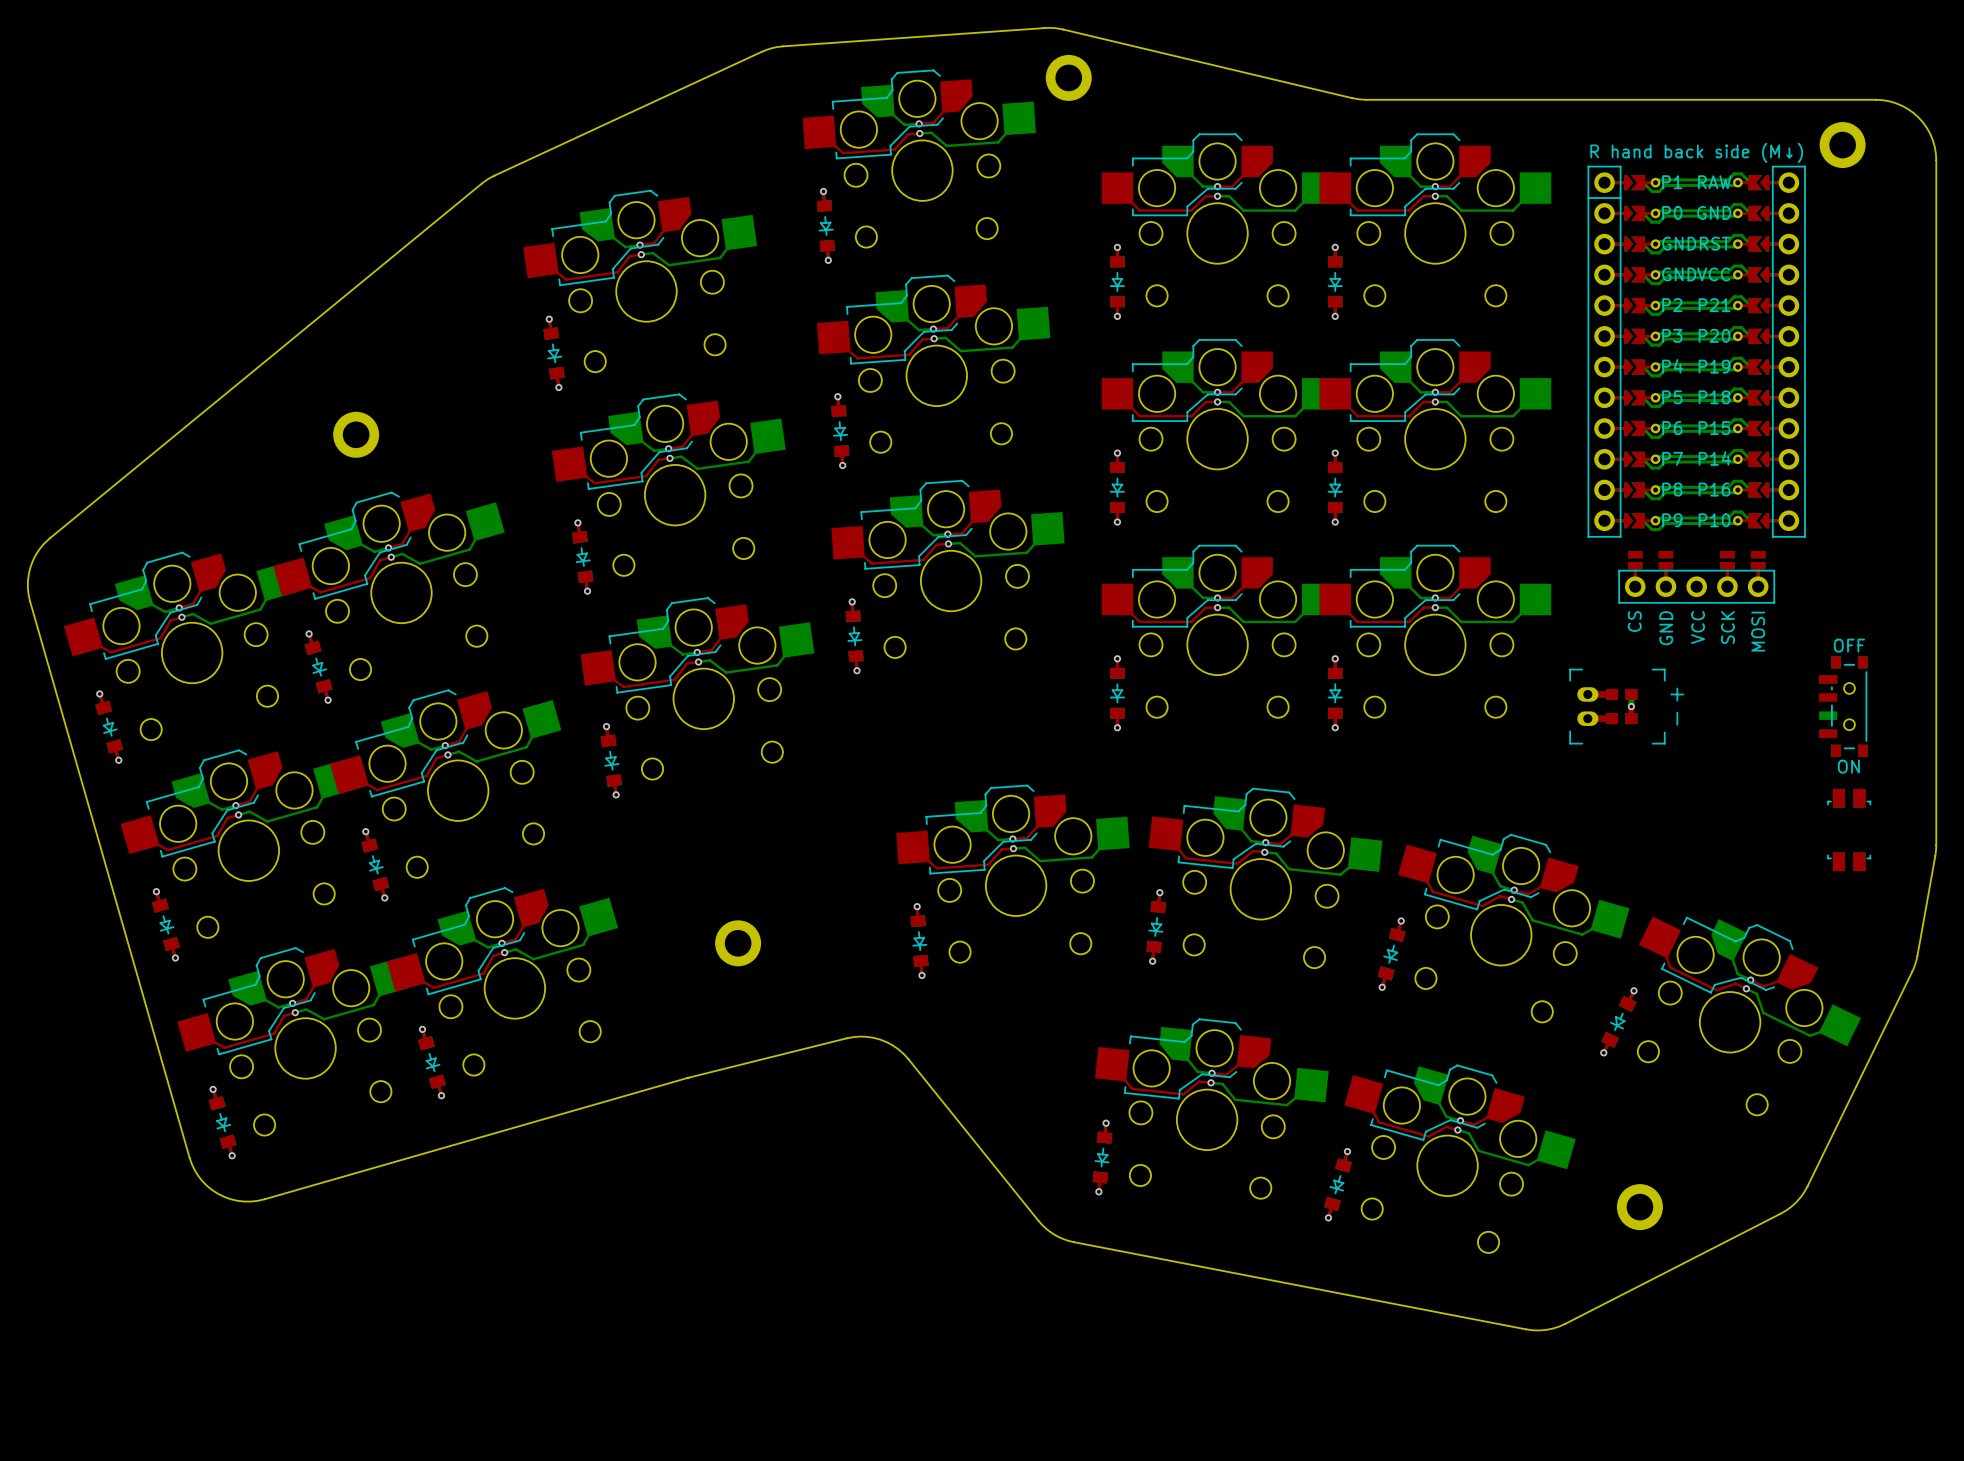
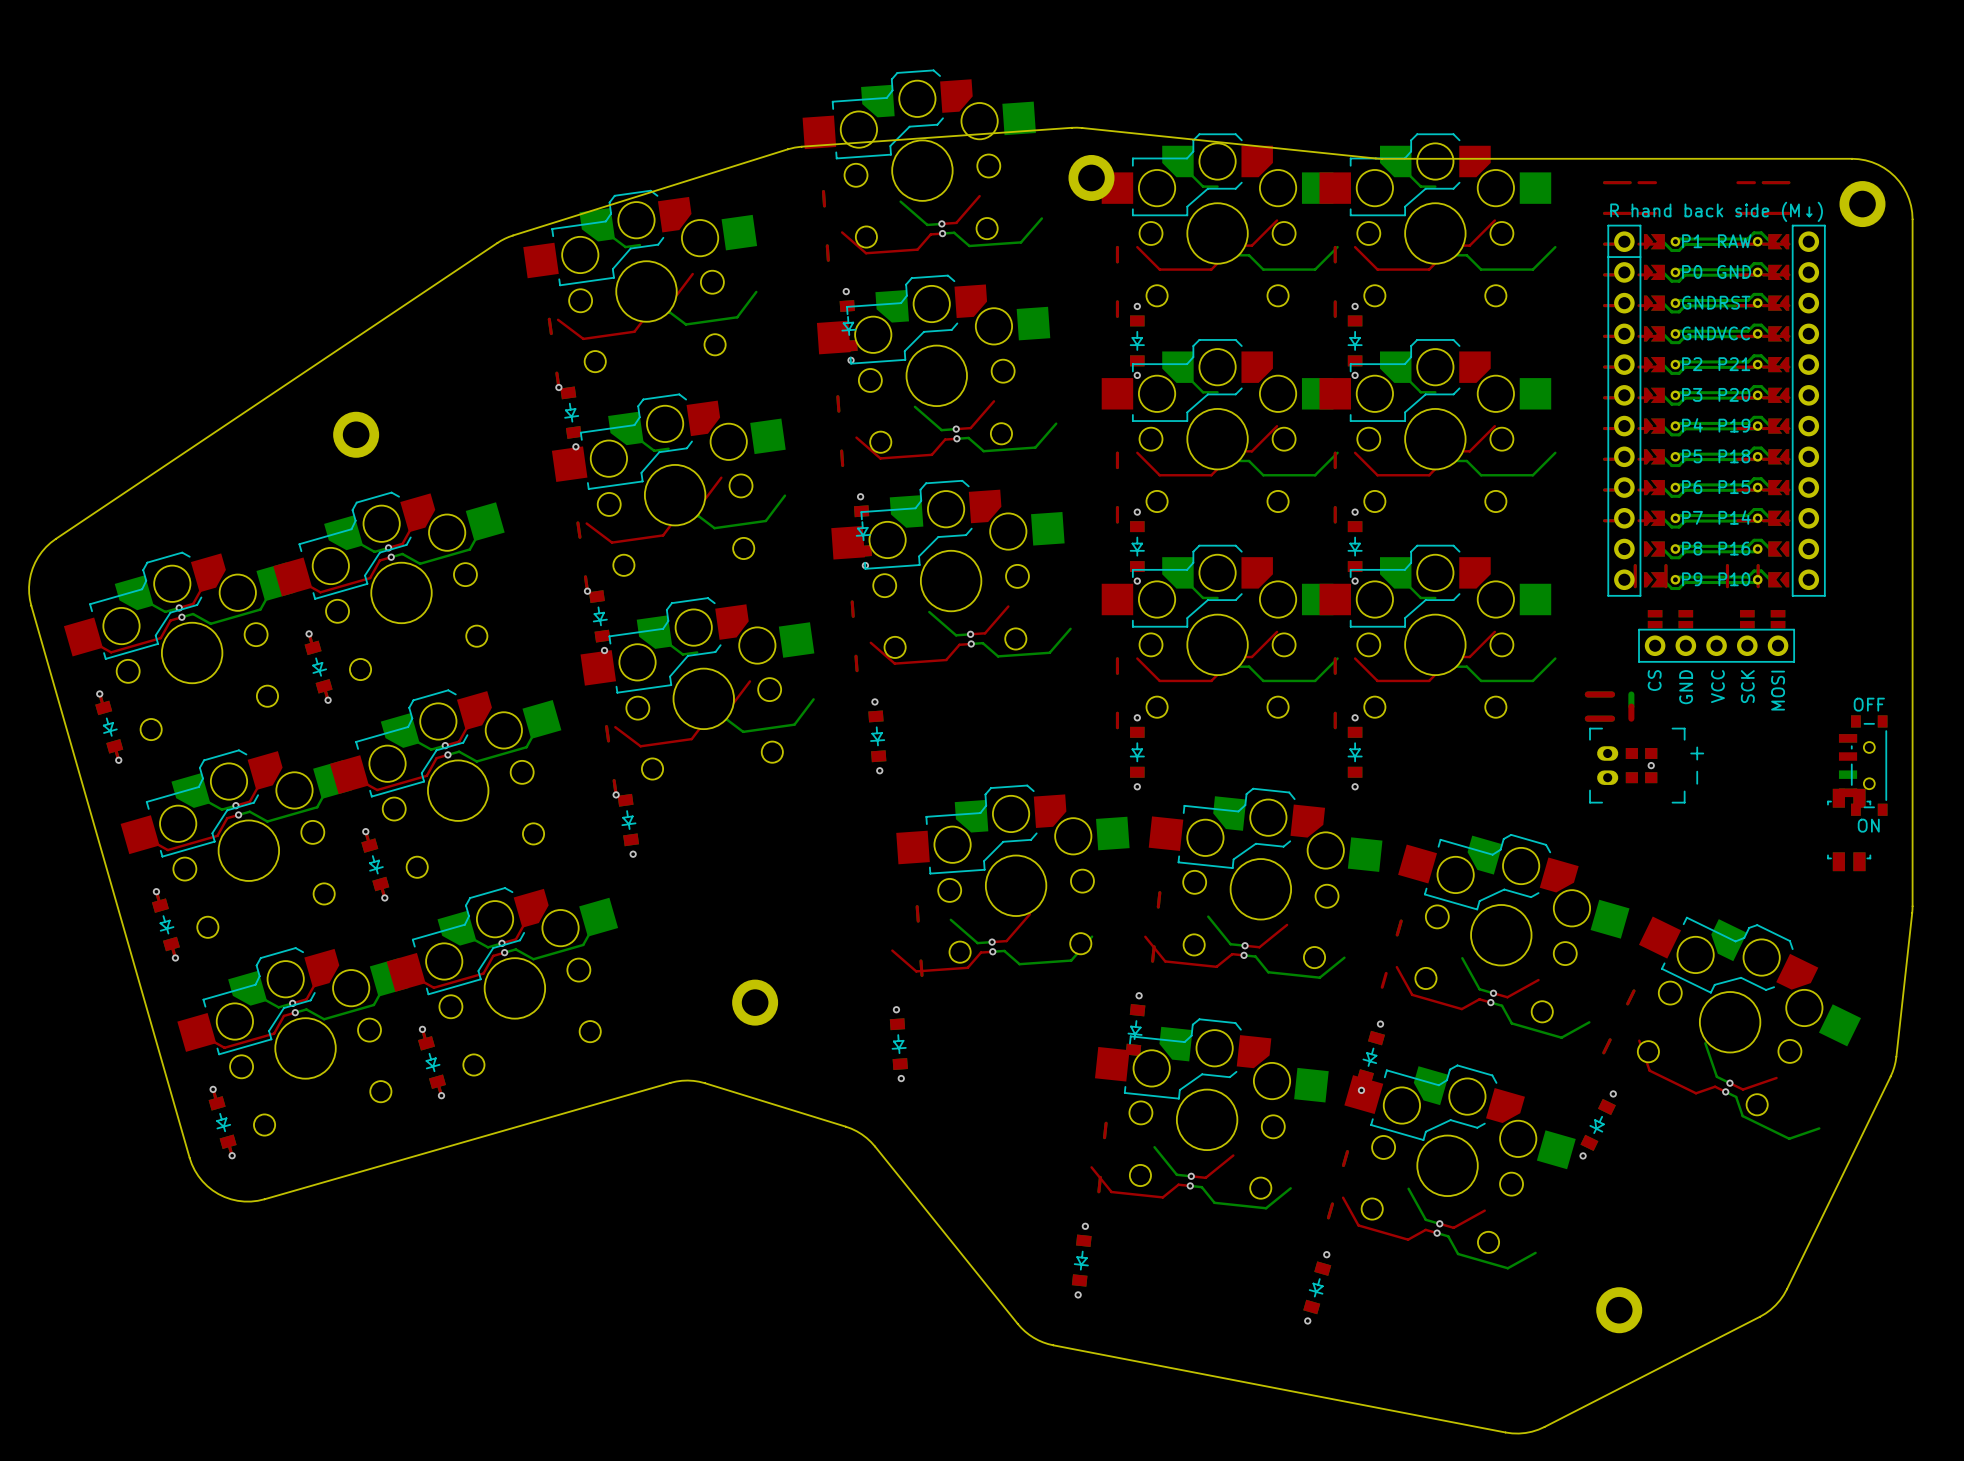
part position: (1068, 77) -> (1091, 177)
top track: (956, 96) (933, 122) (919, 123) -> (979, 196) (956, 222) (941, 223)
bottom track: (877, 101) (904, 124) (919, 123) -> (900, 201) (927, 224) (941, 223)
bottom track: (1019, 118) (998, 142) (946, 145) (931, 132) (919, 133) -> (1041, 218) (1021, 242) (969, 246) (954, 232) (942, 233)
via: (919, 123) -> none
top track: (819, 132) (843, 153) (894, 149) (908, 134) (919, 133) -> (842, 232) (866, 253) (917, 249) (930, 234) (942, 233)
via: (919, 133) -> none
part position: (1842, 145) -> (1862, 204)
top track: (1257, 161) (1232, 186) (1217, 186) -> (1277, 220) (1251, 245) (1237, 245)
top track: (1474, 161) (1449, 186) (1435, 186) -> (1494, 220) (1469, 245) (1455, 245)
bottom track: (1658, 180) (1728, 180) (1734, 173) (1741, 173) (1750, 182) (1754, 182) -> (1678, 239) (1747, 239) (1754, 232) (1761, 232) (1770, 241) (1774, 241)
bottom track: (1638, 182) (1643, 182) (1651, 191) (1659, 191) (1665, 185) (1735, 185) -> (1658, 241) (1663, 241) (1671, 250) (1679, 250) (1685, 244) (1754, 244)
via: (1217, 186) -> none
via: (1435, 186) -> none
top track: (1117, 188) (1139, 210) (1191, 210) (1205, 196) (1217, 196) -> (1137, 247) (1159, 269) (1211, 269) (1225, 255) (1237, 255)
bottom track: (1317, 188) (1295, 210) (1243, 210) (1229, 196) (1217, 196) -> (1337, 247) (1315, 269) (1263, 269) (1249, 255) (1237, 255)
top track: (1335, 188) (1357, 210) (1409, 210) (1423, 196) (1435, 196) -> (1355, 247) (1377, 269) (1429, 269) (1443, 255) (1455, 255)
bottom track: (1535, 188) (1513, 210) (1461, 210) (1446, 196) (1435, 196) -> (1555, 247) (1532, 269) (1481, 269) (1466, 255) (1455, 255)
via: (823, 191) -> none
via: (1217, 196) -> none
via: (1435, 196) -> none
bottom track: (1658, 210) (1728, 210) (1734, 204) (1741, 204) (1750, 213) (1754, 213) -> (1678, 269) (1747, 269) (1754, 263) (1761, 263) (1770, 272) (1774, 272)
bottom track: (1638, 213) (1643, 213) (1651, 222) (1659, 222) (1665, 216) (1735, 216) -> (1658, 272) (1663, 272) (1671, 281) (1679, 281) (1685, 275) (1754, 275)
top track: (675, 214) (654, 243) (639, 245) -> (692, 274) (671, 302) (656, 304)
via: none -> (941, 223)
part: (825, 225) -> none
bottom track: (739, 232) (720, 257) (668, 265) (652, 253) (641, 254) -> (756, 291) (737, 317) (685, 324) (669, 312) (658, 313)
via: none -> (942, 233)
bottom track: (1658, 241) (1728, 241) (1734, 235) (1741, 235) (1750, 244) (1754, 244) -> (1678, 300) (1747, 300) (1754, 294) (1761, 294) (1770, 303) (1774, 303)
bottom track: (1638, 244) (1643, 244) (1651, 252) (1659, 252) (1665, 246) (1735, 246) -> (1658, 303) (1663, 303) (1671, 311) (1679, 311) (1685, 305) (1754, 305)
via: (639, 245) -> none
via: (1117, 247) -> none
via: (1335, 247) -> none
top track: (641, 254) (629, 256) (617, 272) (566, 279) (541, 260) -> (658, 313) (646, 315) (634, 331) (583, 338) (558, 319)
via: (641, 254) -> none
via position: (828, 260) -> (846, 291)
bottom track: (1658, 272) (1728, 272) (1734, 266) (1741, 266) (1750, 274) (1754, 274) -> (1678, 331) (1747, 331) (1754, 325) (1761, 325) (1770, 333) (1774, 333)
bottom track: (1638, 274) (1643, 274) (1651, 283) (1659, 283) (1665, 277) (1735, 277) -> (1658, 333) (1663, 333) (1671, 342) (1679, 342) (1685, 336) (1754, 336)
part position: (1117, 281) -> (1137, 340)
part position: (1335, 281) -> (1355, 340)
top track: (971, 301) (947, 328) (933, 329) -> (994, 401) (970, 428) (956, 429)
bottom track: (1658, 302) (1728, 302) (1734, 296) (1741, 296) (1750, 305) (1754, 305) -> (1678, 361) (1747, 361) (1754, 355) (1761, 355) (1770, 364) (1774, 364)
bottom track: (1638, 305) (1643, 305) (1651, 314) (1659, 314) (1665, 308) (1735, 308) -> (1658, 364) (1663, 364) (1671, 373) (1679, 373) (1685, 367) (1754, 367)
bottom track: (892, 306) (919, 330) (933, 329) -> (914, 406) (941, 430) (956, 429)
via position: (1117, 316) -> (1137, 306)
via position: (1335, 316) -> (1355, 306)
via: (549, 319) -> none
bottom track: (1033, 323) (1012, 347) (960, 351) (945, 337) (934, 338) -> (1056, 423) (1035, 447) (983, 451) (968, 437) (956, 438)
part: none -> (848, 325)
via: (933, 329) -> none
bottom track: (1658, 333) (1728, 333) (1734, 327) (1741, 327) (1750, 336) (1754, 336) -> (1678, 392) (1747, 392) (1754, 386) (1761, 386) (1770, 395) (1774, 395)
bottom track: (1638, 336) (1643, 336) (1651, 345) (1659, 345) (1665, 339) (1735, 339) -> (1658, 395) (1663, 395) (1671, 404) (1679, 404) (1685, 398) (1754, 398)
top track: (833, 337) (857, 358) (909, 354) (922, 339) (934, 338) -> (856, 437) (880, 458) (931, 454) (945, 439) (956, 438)
via: (934, 338) -> none
part position: (1696, 351) -> (1716, 410)
part position: (554, 353) -> (571, 412)
bottom track: (1658, 364) (1728, 364) (1734, 358) (1741, 358) (1750, 367) (1754, 367) -> (1678, 423) (1747, 423) (1754, 417) (1761, 417) (1770, 426) (1774, 426)
top track: (1257, 367) (1232, 392) (1217, 392) -> (1277, 426) (1251, 451) (1237, 451)
top track: (1474, 367) (1449, 392) (1435, 392) -> (1494, 426) (1469, 451) (1455, 451)
bottom track: (1638, 367) (1643, 367) (1651, 375) (1659, 375) (1665, 369) (1735, 369) -> (1658, 426) (1663, 426) (1671, 434) (1679, 434) (1685, 428) (1754, 428)
via: none -> (1137, 375)
via: none -> (1355, 375)
via: (1217, 392) -> none
via: (1435, 392) -> none
top track: (1117, 393) (1139, 416) (1191, 416) (1205, 401) (1217, 401) -> (1137, 452) (1159, 475) (1211, 475) (1225, 460) (1237, 460)
bottom track: (1317, 393) (1295, 416) (1243, 416) (1229, 401) (1217, 401) -> (1337, 452) (1315, 475) (1263, 475) (1249, 460) (1237, 460)
top track: (1335, 393) (1357, 416) (1409, 416) (1423, 401) (1435, 401) -> (1355, 452) (1377, 475) (1429, 475) (1443, 460) (1455, 460)
bottom track: (1535, 393) (1513, 416) (1461, 416) (1446, 401) (1435, 401) -> (1555, 452) (1532, 475) (1481, 475) (1466, 460) (1455, 460)
bottom track: (1658, 395) (1728, 395) (1734, 389) (1741, 389) (1750, 397) (1754, 397) -> (1678, 454) (1747, 454) (1754, 448) (1761, 448) (1770, 456) (1774, 456)
via position: (837, 396) -> (851, 360)
bottom track: (1638, 397) (1643, 397) (1651, 406) (1659, 406) (1665, 400) (1735, 400) -> (1658, 456) (1663, 456) (1671, 465) (1679, 465) (1685, 459) (1754, 459)
via: (1217, 401) -> none
via: (1435, 401) -> none
top track: (704, 418) (682, 446) (668, 448) -> (721, 477) (699, 506) (685, 508)
bottom track: (1658, 425) (1728, 425) (1734, 419) (1741, 419) (1750, 428) (1754, 428) -> (1678, 484) (1747, 484) (1754, 478) (1761, 478) (1770, 487) (1774, 487)
bottom track: (1638, 428) (1643, 428) (1651, 437) (1659, 437) (1665, 431) (1735, 431) -> (1658, 487) (1663, 487) (1671, 496) (1679, 496) (1685, 490) (1754, 490)
via: none -> (956, 429)
part: (840, 431) -> none
bottom track: (767, 436) (748, 461) (697, 468) (681, 456) (669, 458) -> (784, 495) (765, 520) (714, 528) (698, 516) (686, 517)
via: none -> (956, 438)
via: none -> (575, 446)
via: (668, 448) -> none
via: (1117, 453) -> none
via: (1335, 453) -> none
bottom track: (1658, 456) (1728, 456) (1734, 450) (1741, 450) (1750, 459) (1754, 459) -> (1678, 515) (1747, 515) (1754, 509) (1761, 509) (1770, 518) (1774, 518)
top track: (669, 458) (658, 459) (646, 476) (595, 483) (569, 464) -> (686, 517) (675, 519) (663, 535) (612, 542) (586, 523)
via: (669, 458) -> none
bottom track: (1638, 459) (1643, 459) (1651, 468) (1659, 468) (1665, 462) (1735, 462) -> (1658, 518) (1663, 518) (1671, 527) (1679, 527) (1685, 521) (1754, 521)
via position: (842, 465) -> (860, 496)
part position: (1117, 487) -> (1137, 546)
part position: (1335, 487) -> (1355, 546)
bottom track: (1658, 487) (1728, 487) (1734, 481) (1741, 481) (1750, 489) (1754, 489) -> (1678, 546) (1747, 546) (1754, 540) (1761, 540) (1770, 549) (1774, 549)
bottom track: (1638, 489) (1643, 489) (1651, 498) (1659, 498) (1665, 492) (1735, 492) -> (1658, 549) (1663, 549) (1671, 557) (1679, 557) (1685, 551) (1754, 551)
top track: (985, 506) (962, 533) (947, 534) -> (1008, 606) (985, 633) (970, 634)
bottom track: (906, 511) (933, 535) (947, 534) -> (929, 612) (956, 635) (970, 634)
bottom track: (1658, 518) (1728, 518) (1734, 511) (1741, 511) (1750, 520) (1754, 520) -> (1678, 577) (1747, 577) (1754, 570) (1761, 570) (1770, 579) (1774, 579)
bottom track: (1638, 520) (1643, 520) (1651, 529) (1659, 529) (1665, 523) (1735, 523) -> (1658, 579) (1663, 579) (1671, 588) (1679, 588) (1685, 582) (1754, 582)
via: (577, 522) -> none
via position: (1117, 522) -> (1137, 512)
via position: (1335, 522) -> (1355, 512)
bottom track: (1047, 528) (1027, 552) (975, 556) (960, 543) (948, 543) -> (1070, 628) (1049, 652) (998, 656) (982, 643) (971, 643)
part: none -> (862, 531)
via: (947, 534) -> none
top track: (848, 542) (872, 563) (923, 559) (936, 544) (948, 543) -> (870, 642) (894, 663) (946, 660) (959, 644) (971, 643)
via: (948, 543) -> none
part position: (582, 557) -> (599, 616)
top track: (1257, 572) (1232, 597) (1217, 597) -> (1277, 631) (1251, 657) (1237, 657)
top track: (1474, 572) (1449, 597) (1435, 597) -> (1494, 631) (1469, 657) (1455, 657)
part position: (1696, 577) -> (1716, 636)
via: none -> (1137, 581)
via: none -> (1355, 581)
via: (1217, 597) -> none
via: (1435, 597) -> none
top track: (1117, 599) (1139, 621) (1191, 621) (1205, 607) (1217, 607) -> (1137, 658) (1159, 680) (1211, 680) (1225, 666) (1237, 666)
bottom track: (1317, 599) (1295, 621) (1243, 621) (1229, 607) (1217, 607) -> (1337, 658) (1315, 680) (1263, 680) (1249, 666) (1237, 666)
top track: (1335, 599) (1357, 621) (1409, 621) (1423, 607) (1435, 607) -> (1355, 658) (1377, 680) (1429, 680) (1443, 666) (1455, 666)
bottom track: (1535, 599) (1513, 621) (1461, 621) (1446, 607) (1435, 607) -> (1555, 658) (1532, 680) (1481, 680) (1466, 666) (1455, 666)
via position: (852, 601) -> (865, 565)
board edge: (31, 605) (27, 587) (28, 573) (33, 560) (44, 543) (484, 181) (772, 48) (1054, 28) (1359, 99) (1875, 99) (1889, 101) (1902, 105) (1913, 112) (1923, 122) (1932, 140) (1936, 160) (1936, 850) (1913, 967) (1807, 1186) (1791, 1206) (1565, 1323) (1552, 1328) (1532, 1330) (1074, 1242) (1059, 1237) (1038, 1220) (903, 1054) (893, 1045) (880, 1039) (860, 1036) (846, 1038) (670, 1082) -> (31, 605) (29, 587) (32, 568) (38, 557) (50, 542) (501, 240) (794, 147) (1077, 127) (1379, 158) (1858, 159) (1872, 162) (1884, 168) (1899, 181) (1909, 199) (1912, 219) (1912, 906) (1896, 1056) (1890, 1076) (1786, 1289) (1779, 1300) (1765, 1313) (1544, 1426) (1518, 1433) (1053, 1345) (1033, 1337) (1021, 1327) (875, 1146) (861, 1134) (845, 1126) (705, 1083) (687, 1080) (670, 1082)
via: (1217, 607) -> none
via: (1435, 607) -> none
top track: (732, 622) (711, 650) (697, 652) -> (749, 681) (728, 709) (714, 711)
via: none -> (970, 634)
part: (854, 636) -> none
bottom track: (796, 640) (777, 665) (726, 672) (710, 660) (698, 662) -> (813, 699) (794, 724) (743, 731) (727, 719) (715, 721)
via: none -> (971, 643)
via: none -> (604, 650)
via: (697, 652) -> none
via: (1117, 658) -> none
via: (1335, 658) -> none
top track: (698, 662) (686, 663) (674, 679) (623, 686) (598, 667) -> (715, 721) (703, 722) (691, 739) (640, 746) (615, 727)
via: (698, 662) -> none
via position: (857, 670) -> (874, 701)
part position: (1117, 693) -> (1137, 752)
part position: (1335, 693) -> (1355, 752)
part: (1626, 706) -> none
via position: (1631, 706) -> (1651, 765)
part position: (1843, 706) -> (1863, 765)
via: (606, 726) -> none
via position: (1117, 727) -> (1137, 717)
via position: (1335, 727) -> (1355, 717)
part: none -> (877, 736)
part position: (611, 760) -> (628, 820)
part: none -> (1646, 765)
via: none -> (879, 770)
via: none -> (1137, 786)
via: none -> (1355, 786)
top track: (1050, 811) (1027, 837) (1012, 839) -> (1029, 914) (1006, 941) (992, 942)
bottom track: (1228, 813) (1251, 841) (1265, 842) -> (1208, 916) (1230, 944) (1245, 945)
bottom track: (971, 816) (998, 840) (1012, 839) -> (950, 919) (977, 943) (992, 942)
top track: (1307, 821) (1280, 844) (1265, 842) -> (1287, 924) (1259, 947) (1245, 945)
bottom track: (1112, 833) (1091, 857) (1040, 861) (1025, 847) (1013, 848) -> (1092, 936) (1071, 960) (1019, 964) (1004, 950) (992, 951)
top track: (1166, 833) (1185, 858) (1237, 863) (1253, 851) (1264, 852) -> (1145, 936) (1165, 961) (1216, 966) (1232, 954) (1244, 955)
via: (1012, 839) -> none
via: (1265, 842) -> none
top track: (913, 847) (936, 868) (988, 864) (1001, 849) (1013, 848) -> (892, 950) (916, 971) (967, 967) (981, 952) (992, 951)
via: (1013, 848) -> none
bottom track: (1264, 852) (1276, 853) (1289, 869) (1340, 874) (1365, 854) -> (1244, 955) (1255, 956) (1268, 972) (1319, 977) (1344, 957)
via: (1264, 852) -> none
via: none -> (633, 854)
bottom track: (1483, 855) (1500, 886) (1514, 890) -> (1462, 958) (1479, 989) (1493, 993)
top track: (1417, 864) (1432, 891) (1482, 905) (1500, 896) (1511, 899) -> (1396, 967) (1412, 994) (1461, 1009) (1479, 999) (1490, 1002)
top track: (1559, 876) (1528, 894) (1514, 890) -> (1538, 980) (1507, 997) (1493, 993)
via: (1514, 890) -> none
via: (1159, 892) -> none
bottom track: (1511, 899) (1522, 902) (1532, 920) (1582, 934) (1610, 919) -> (1490, 1002) (1502, 1005) (1511, 1023) (1561, 1037) (1589, 1022)
via: (1511, 899) -> none
via: (917, 906) -> none
via: (1401, 921) -> none
part: (1156, 926) -> none
top track: (1660, 937) (1670, 967) (1716, 990) (1735, 983) (1746, 988) -> (1639, 1040) (1649, 1070) (1696, 1093) (1715, 1086) (1725, 1091)
bottom track: (1726, 940) (1737, 973) (1750, 980) -> (1705, 1043) (1716, 1076) (1729, 1083)
part: (919, 941) -> none
via: none -> (992, 942)
part position: (738, 943) -> (755, 1002)
via: none -> (1245, 945)
via: none -> (992, 951)
part: (1391, 954) -> none
via: none -> (1244, 955)
via position: (1152, 961) -> (1139, 995)
top track: (1797, 974) (1763, 986) (1750, 980) -> (1776, 1078) (1742, 1089) (1729, 1083)
via: (921, 975) -> none
via: (1750, 980) -> none
via position: (1382, 987) -> (1380, 1024)
bottom track: (1746, 988) (1756, 993) (1763, 1012) (1809, 1035) (1839, 1025) -> (1725, 1091) (1736, 1096) (1742, 1116) (1789, 1138) (1819, 1128)
via: (1746, 988) -> none
via: (1634, 990) -> none
via: none -> (1493, 993)
via: none -> (1490, 1002)
via: none -> (896, 1009)
part position: (1618, 1021) -> (1598, 1124)
part: none -> (1135, 1030)
part: none -> (898, 1044)
bottom track: (1175, 1044) (1197, 1071) (1212, 1073) -> (1154, 1147) (1176, 1174) (1191, 1176)
top track: (1254, 1052) (1226, 1074) (1212, 1073) -> (1233, 1155) (1205, 1177) (1191, 1176)
via position: (1603, 1052) -> (1613, 1093)
part: none -> (1370, 1057)
top track: (1112, 1064) (1132, 1088) (1183, 1094) (1199, 1081) (1211, 1082) -> (1091, 1167) (1111, 1192) (1162, 1197) (1178, 1184) (1190, 1185)
via: (1212, 1073) -> none
via: none -> (901, 1078)
bottom track: (1211, 1082) (1222, 1084) (1235, 1099) (1286, 1105) (1311, 1085) -> (1190, 1185) (1201, 1187) (1214, 1202) (1266, 1208) (1290, 1188)
via: (1211, 1082) -> none
via: none -> (1729, 1083)
bottom track: (1429, 1085) (1446, 1116) (1460, 1120) -> (1408, 1188) (1425, 1219) (1439, 1223)
via: none -> (1361, 1090)
via: none -> (1725, 1091)
top track: (1363, 1094) (1379, 1122) (1428, 1136) (1446, 1126) (1457, 1130) -> (1343, 1197) (1358, 1225) (1408, 1239) (1425, 1229) (1437, 1233)
top track: (1505, 1107) (1474, 1124) (1460, 1120) -> (1484, 1210) (1453, 1227) (1439, 1223)
via: (1460, 1120) -> none
via: (1106, 1123) -> none
bottom track: (1457, 1130) (1468, 1133) (1478, 1150) (1528, 1165) (1556, 1149) -> (1437, 1233) (1448, 1236) (1458, 1253) (1507, 1268) (1535, 1252)
via: (1457, 1130) -> none
via: (1347, 1151) -> none
via: none -> (1583, 1155)
part: (1102, 1157) -> none
via: none -> (1191, 1176)
part: (1337, 1184) -> none
via: none -> (1190, 1185)
via position: (1098, 1191) -> (1085, 1226)
part position: (1639, 1207) -> (1619, 1310)
via position: (1328, 1217) -> (1326, 1254)
via: none -> (1439, 1223)
via: none -> (1437, 1233)
part: none -> (1081, 1260)
part: none -> (1317, 1287)
via: none -> (1078, 1294)
via: none -> (1307, 1320)

